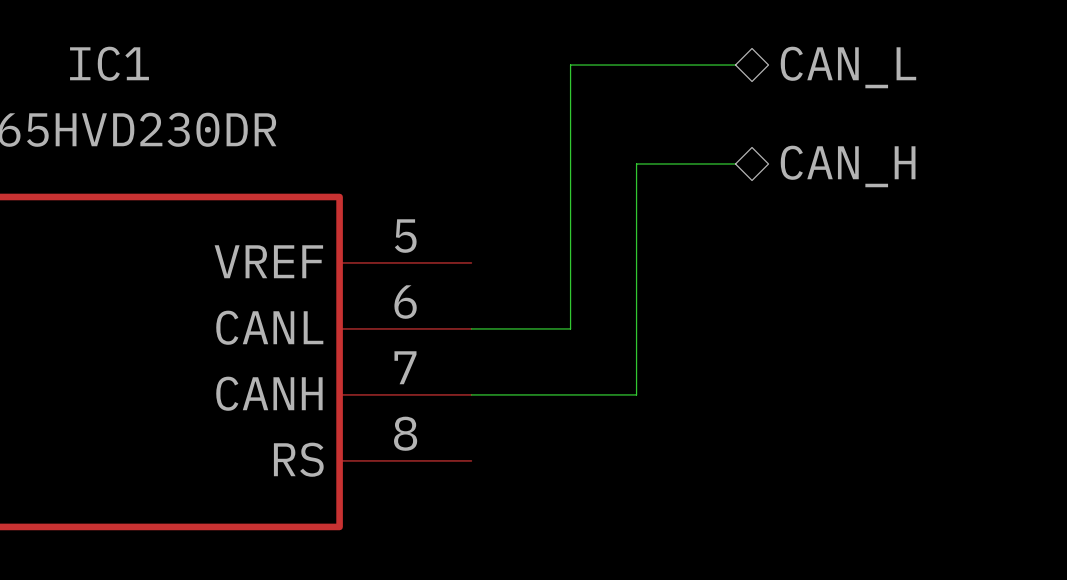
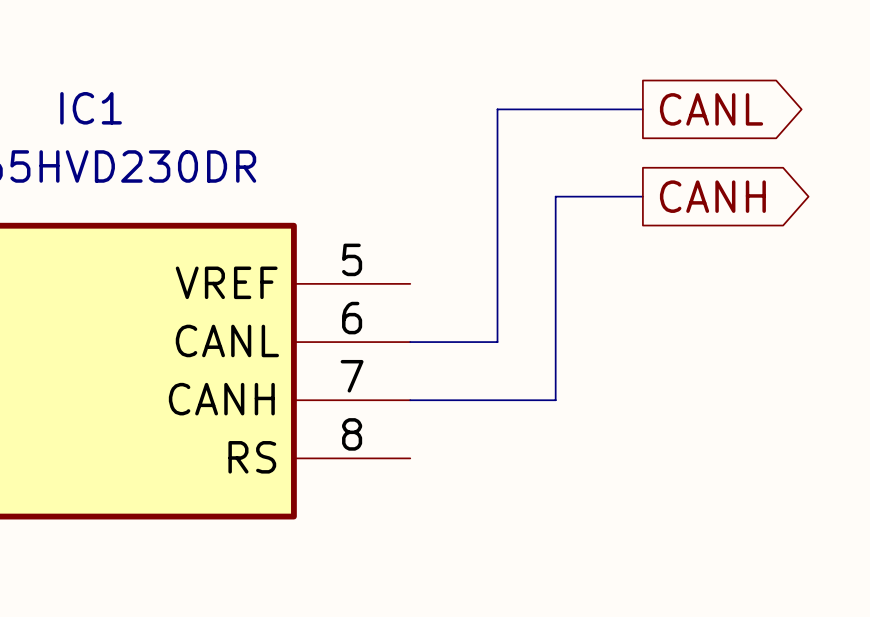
global label: none -> CANL (711, 109)
hierarchical label: CAN_L (848, 67) -> none
global label: none -> CANH (712, 196)
hierarchical label: CAN_H (848, 166) -> none

